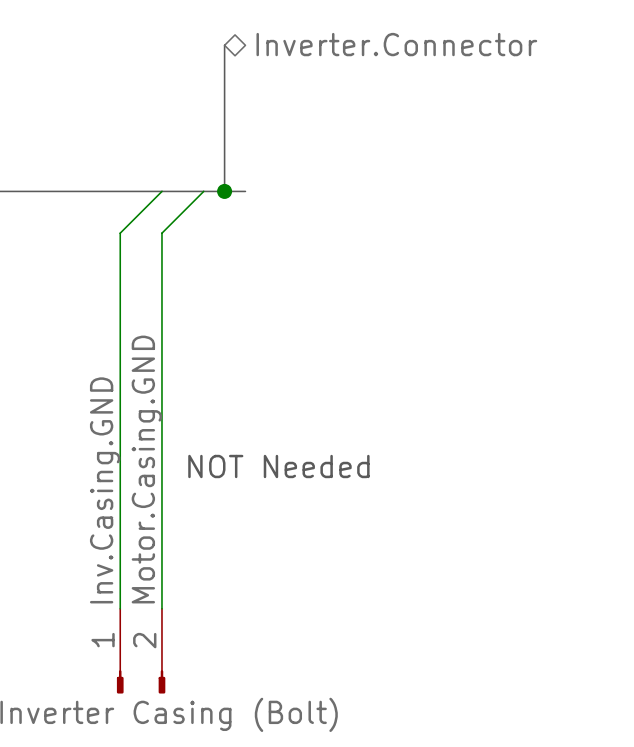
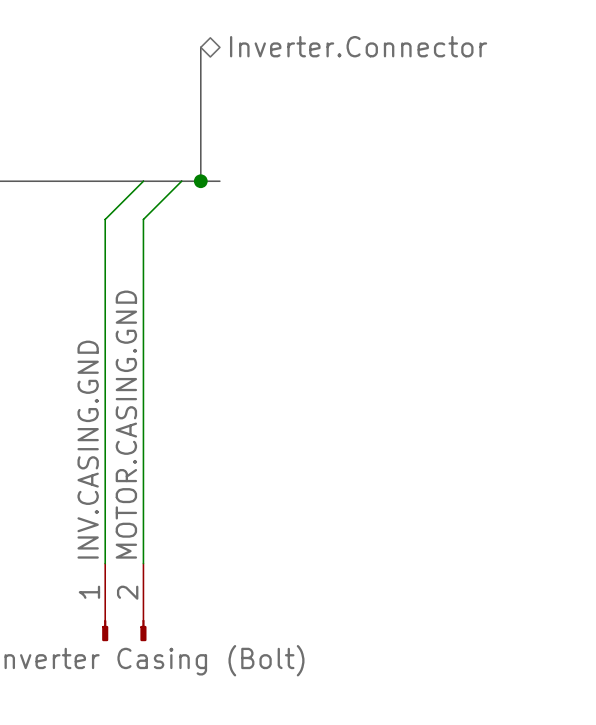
text: NOT Needed (278, 466) -> none
label: Motor.Casing.GND (146, 469) -> MOTOR.CASING.GND (126, 424)
label: Inv.Casing.GND (105, 490) -> INV.CASING.GND (88, 449)

